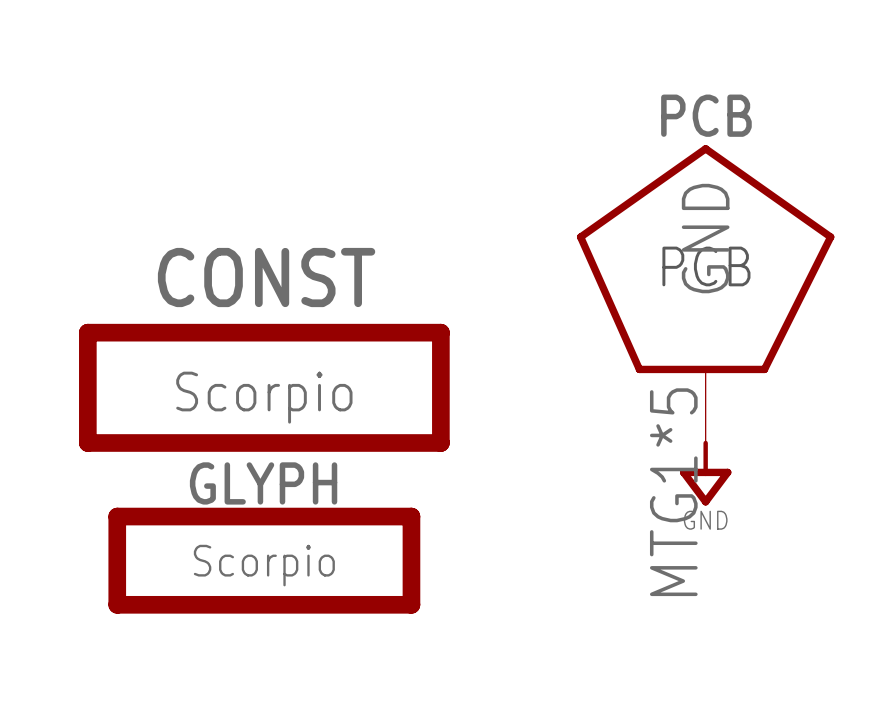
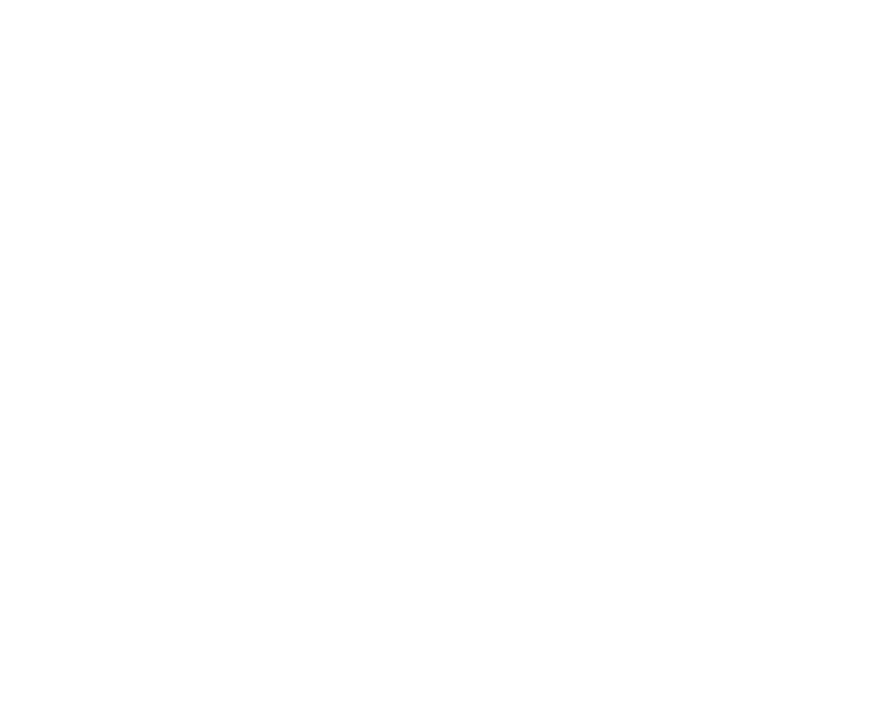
PCB: (705, 294) -> none
CONST: Scorpio (264, 387) -> none
power symbol: GND (705, 473) -> none
GLYPH: Scorpio (264, 560) -> none

